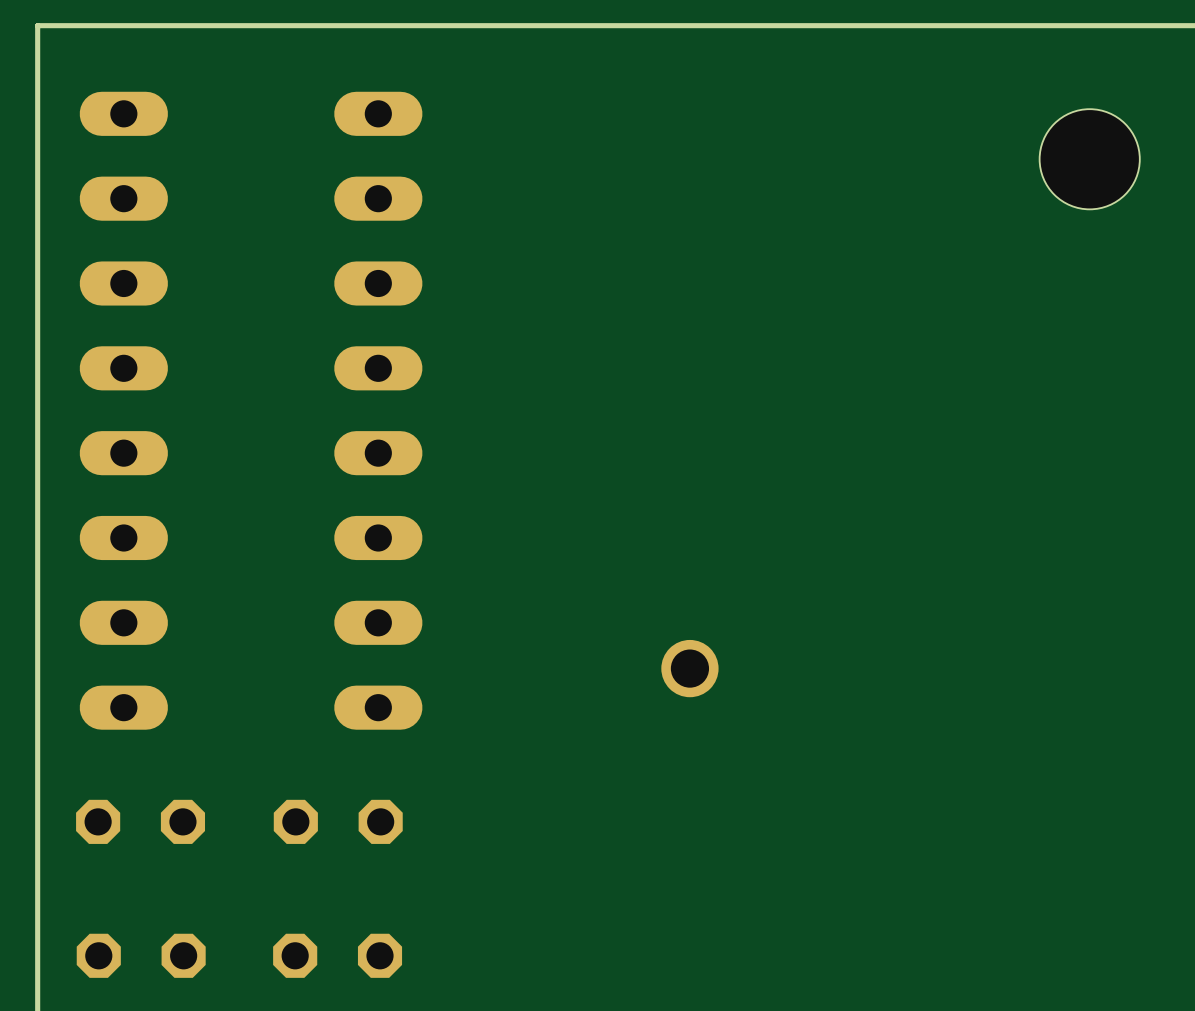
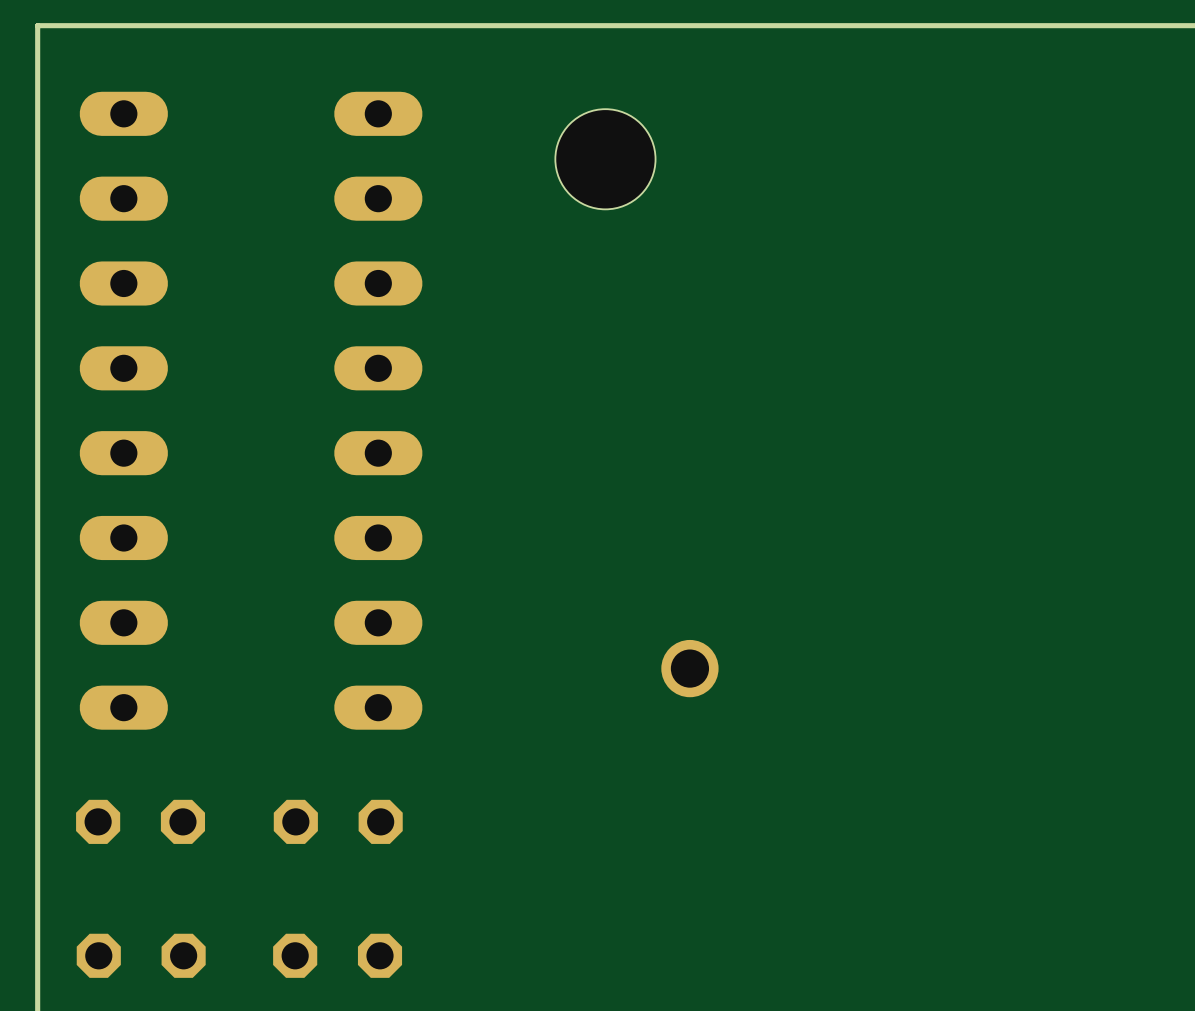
hole position: (1089, 159) -> (605, 159)

